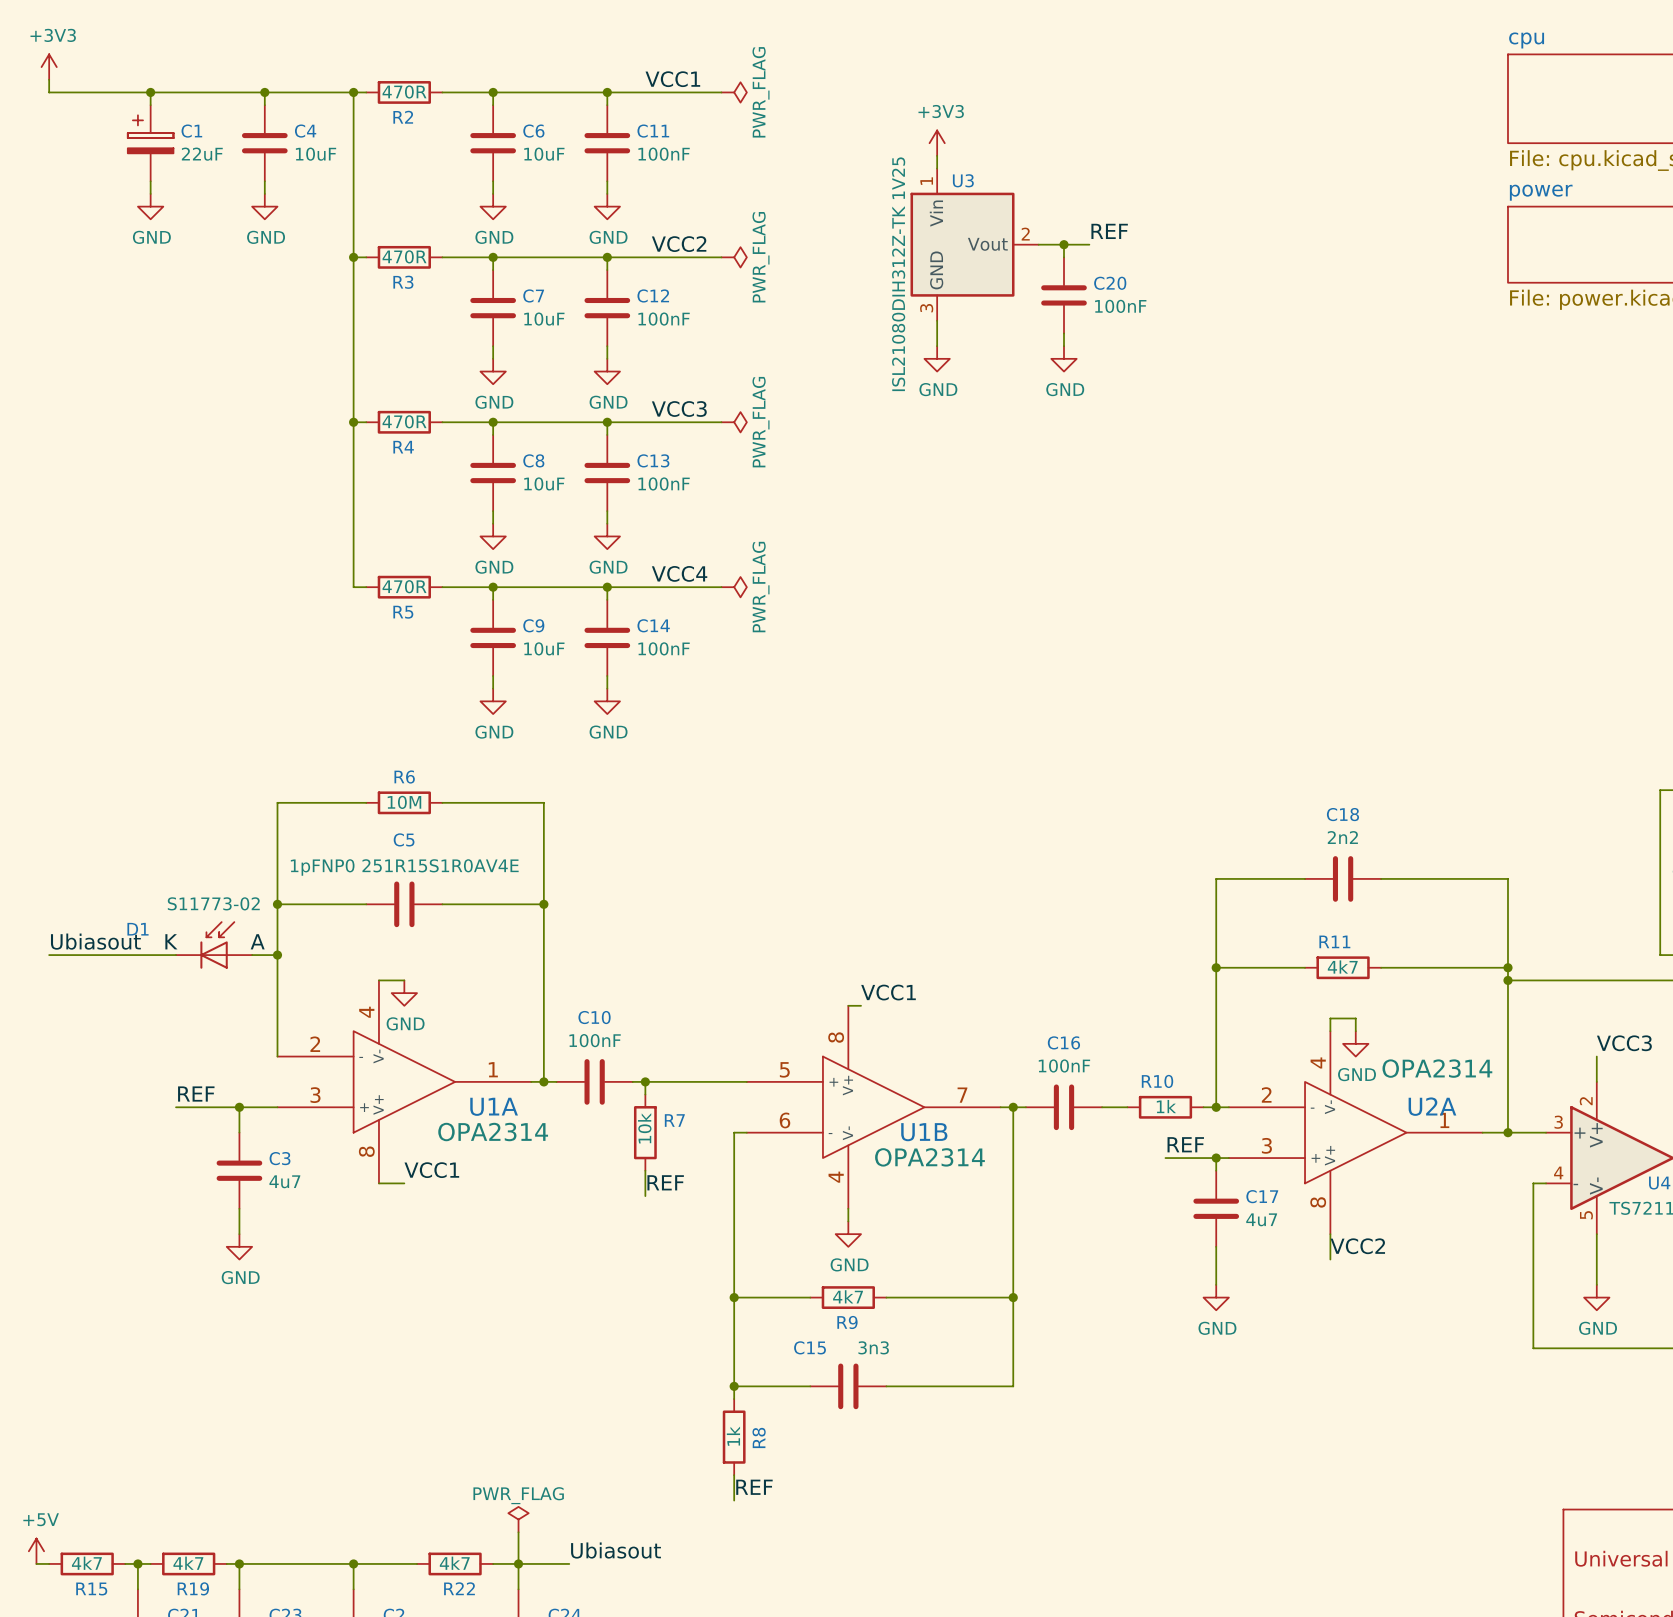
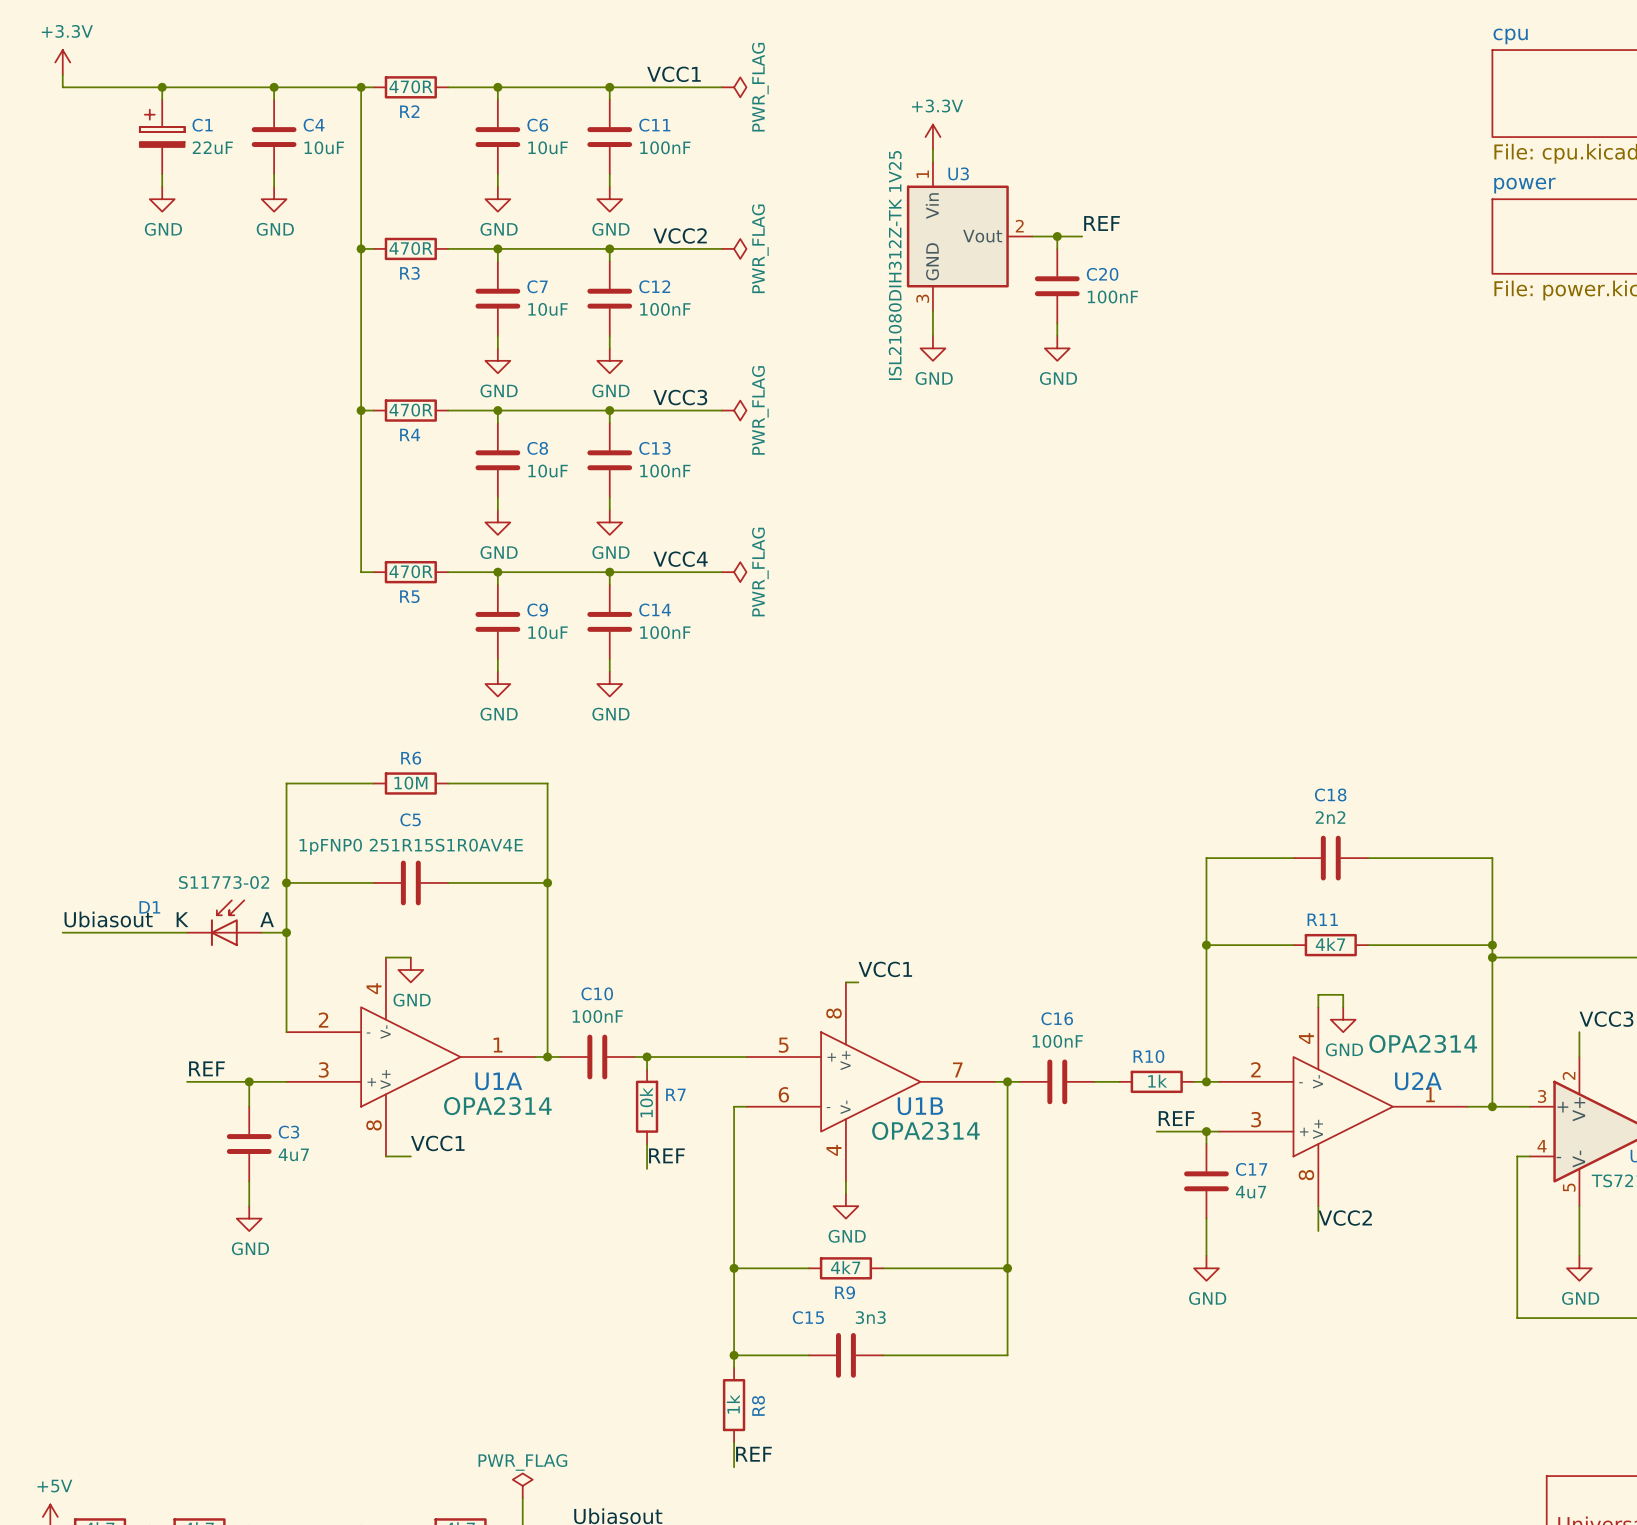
power symbol: +3V3 (49, 67) -> +3.3V (62, 62)
power symbol: +3V3 (937, 143) -> +3.3V (932, 137)

